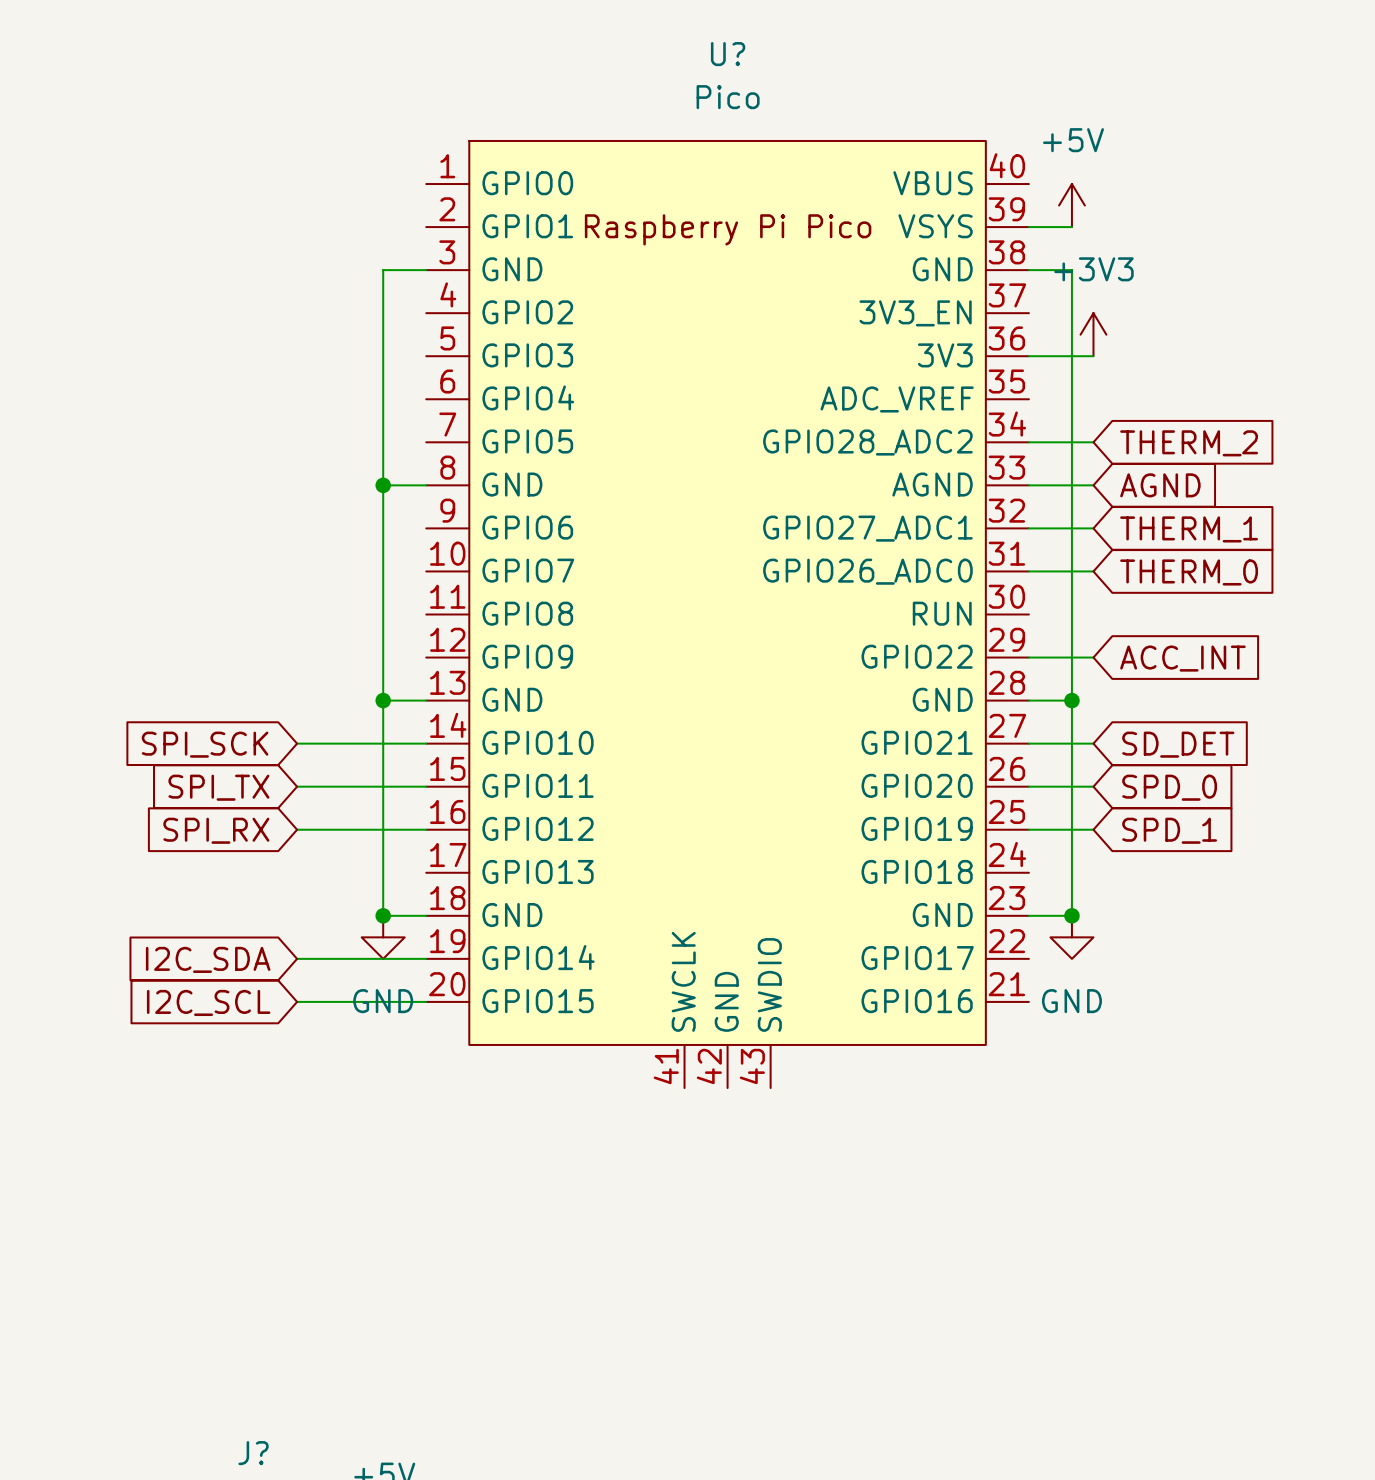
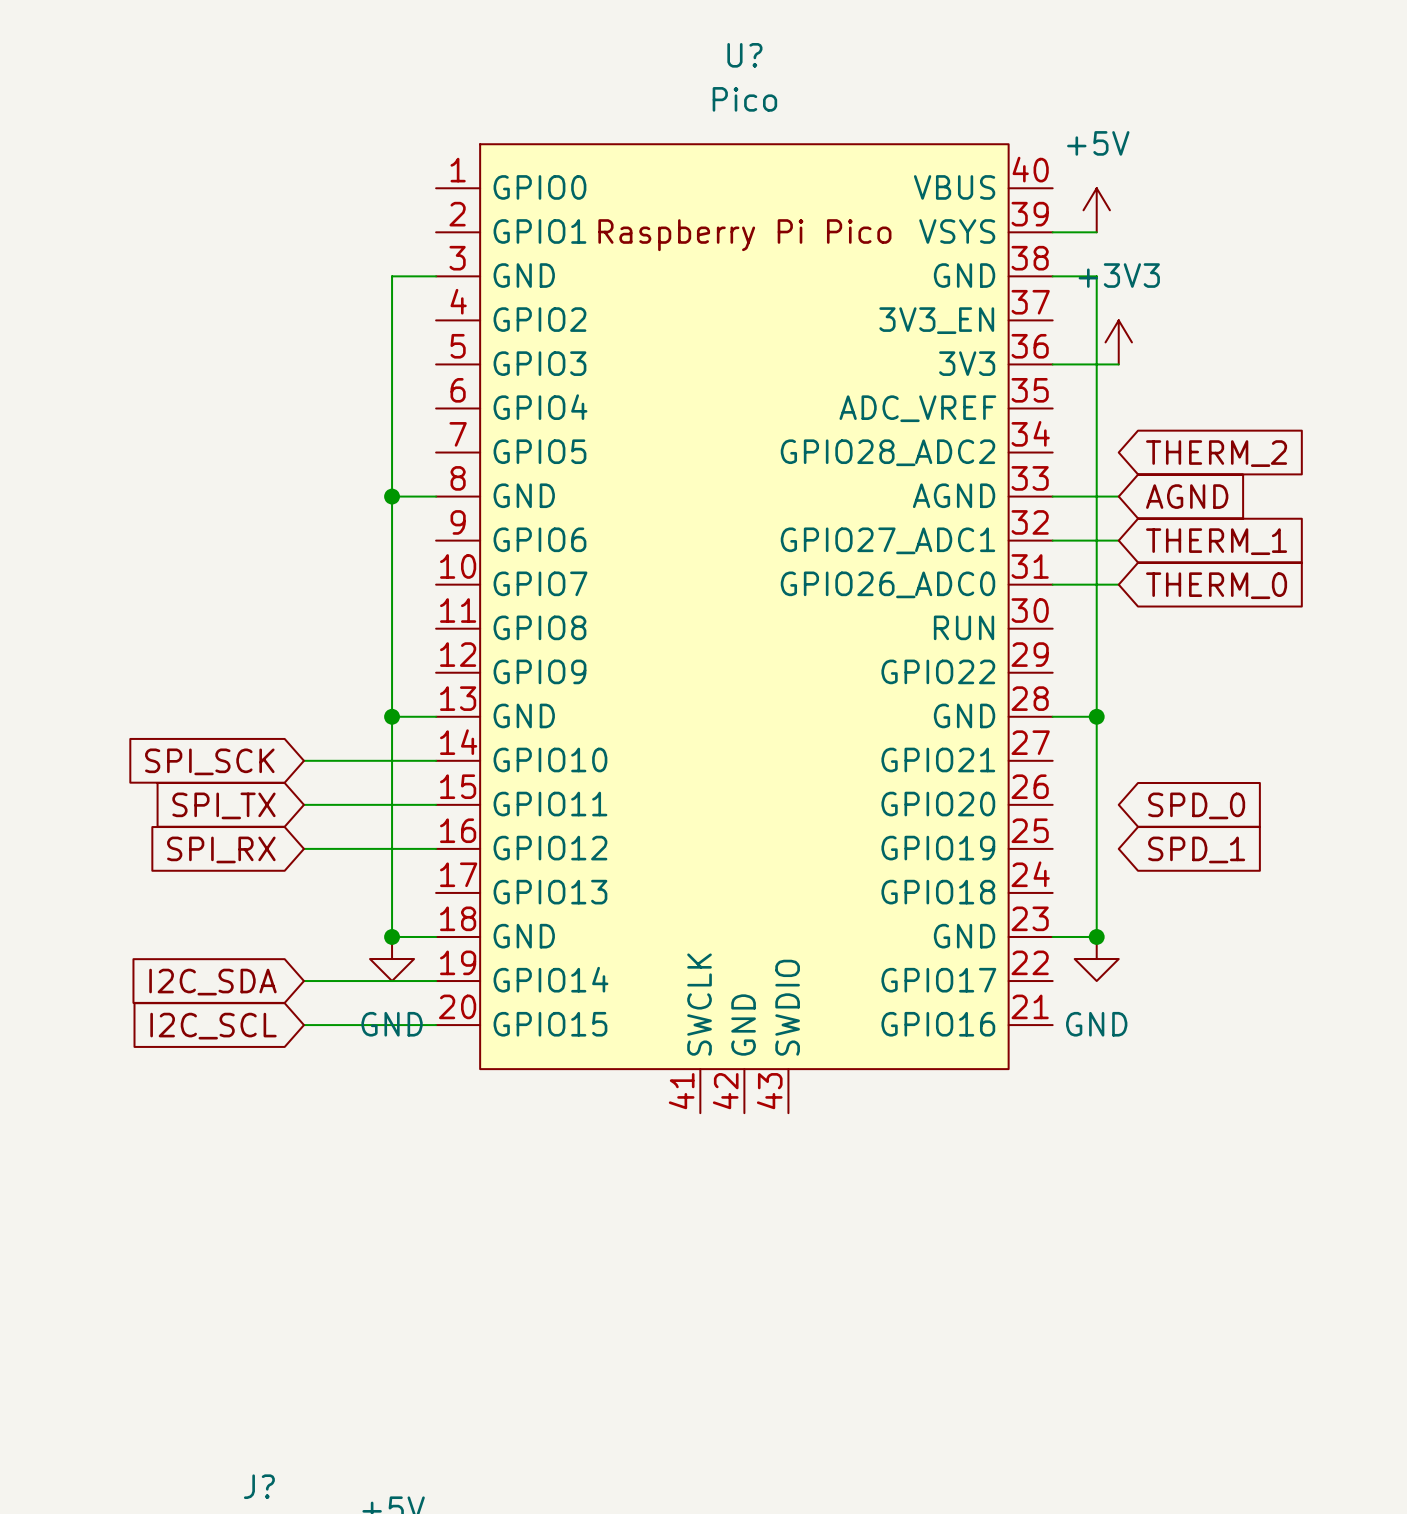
wire: (1028, 442) (1093, 442) -> none
wire: (1028, 657) (1093, 657) -> none
global label: ACC_INT (1182, 658) -> none
wire: (1028, 743) (1093, 743) -> none
global label: SD_DET (1178, 744) -> none
wire: (1028, 786) (1093, 786) -> none
wire: (1028, 829) (1093, 829) -> none

